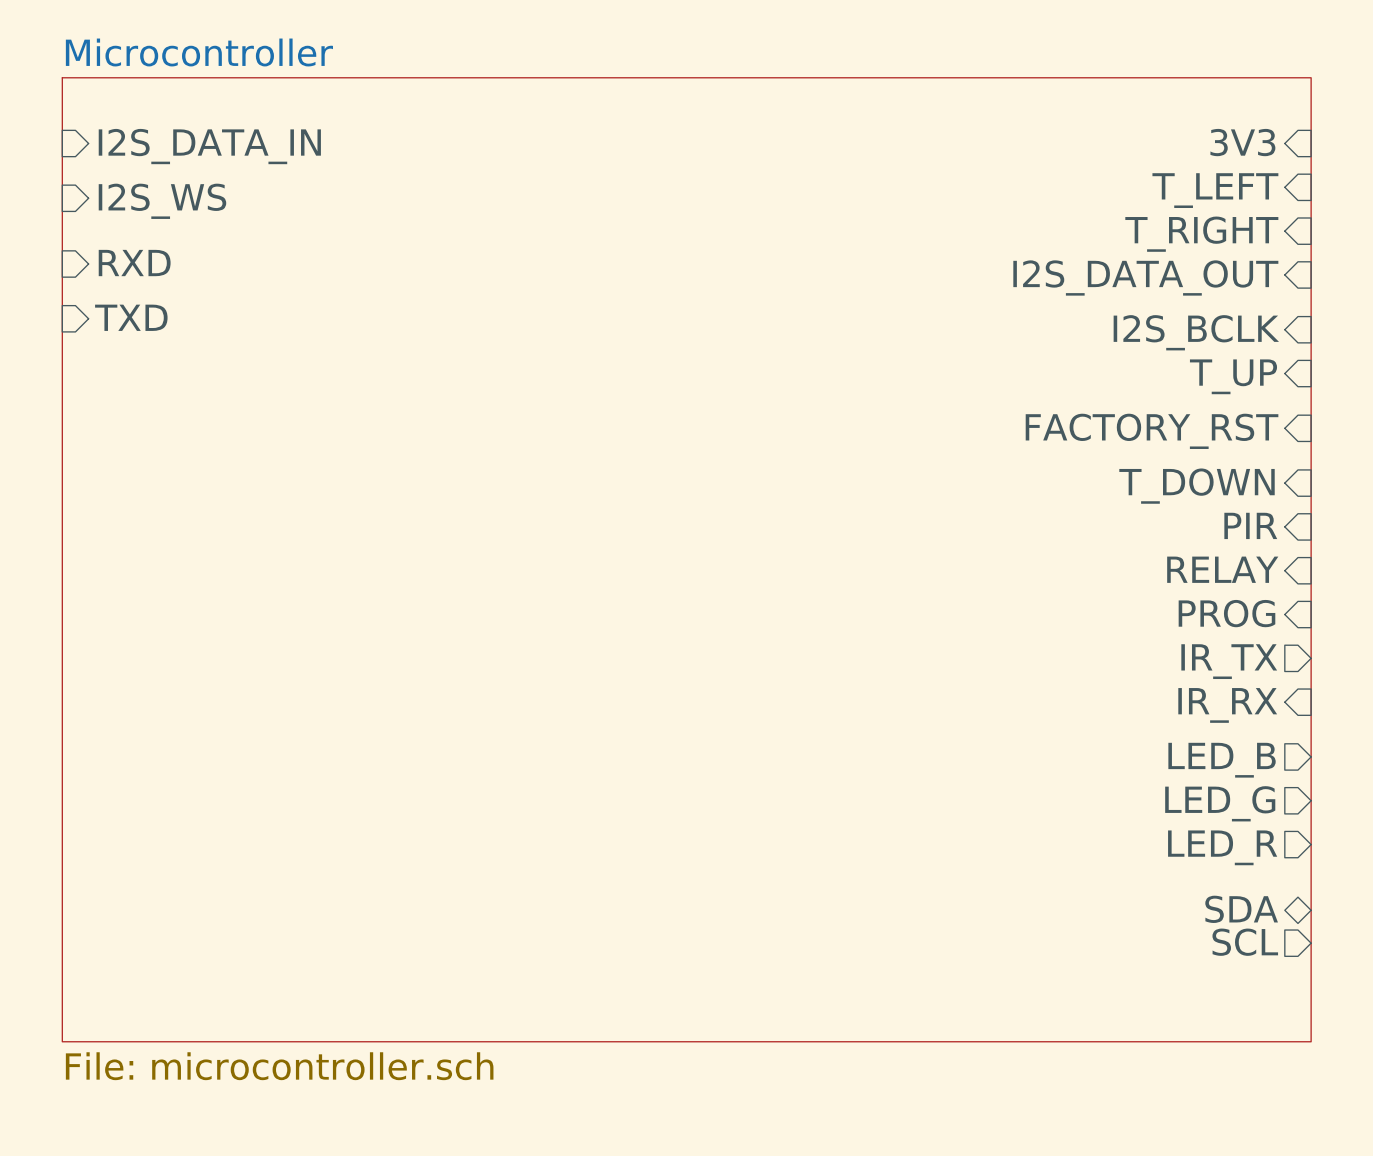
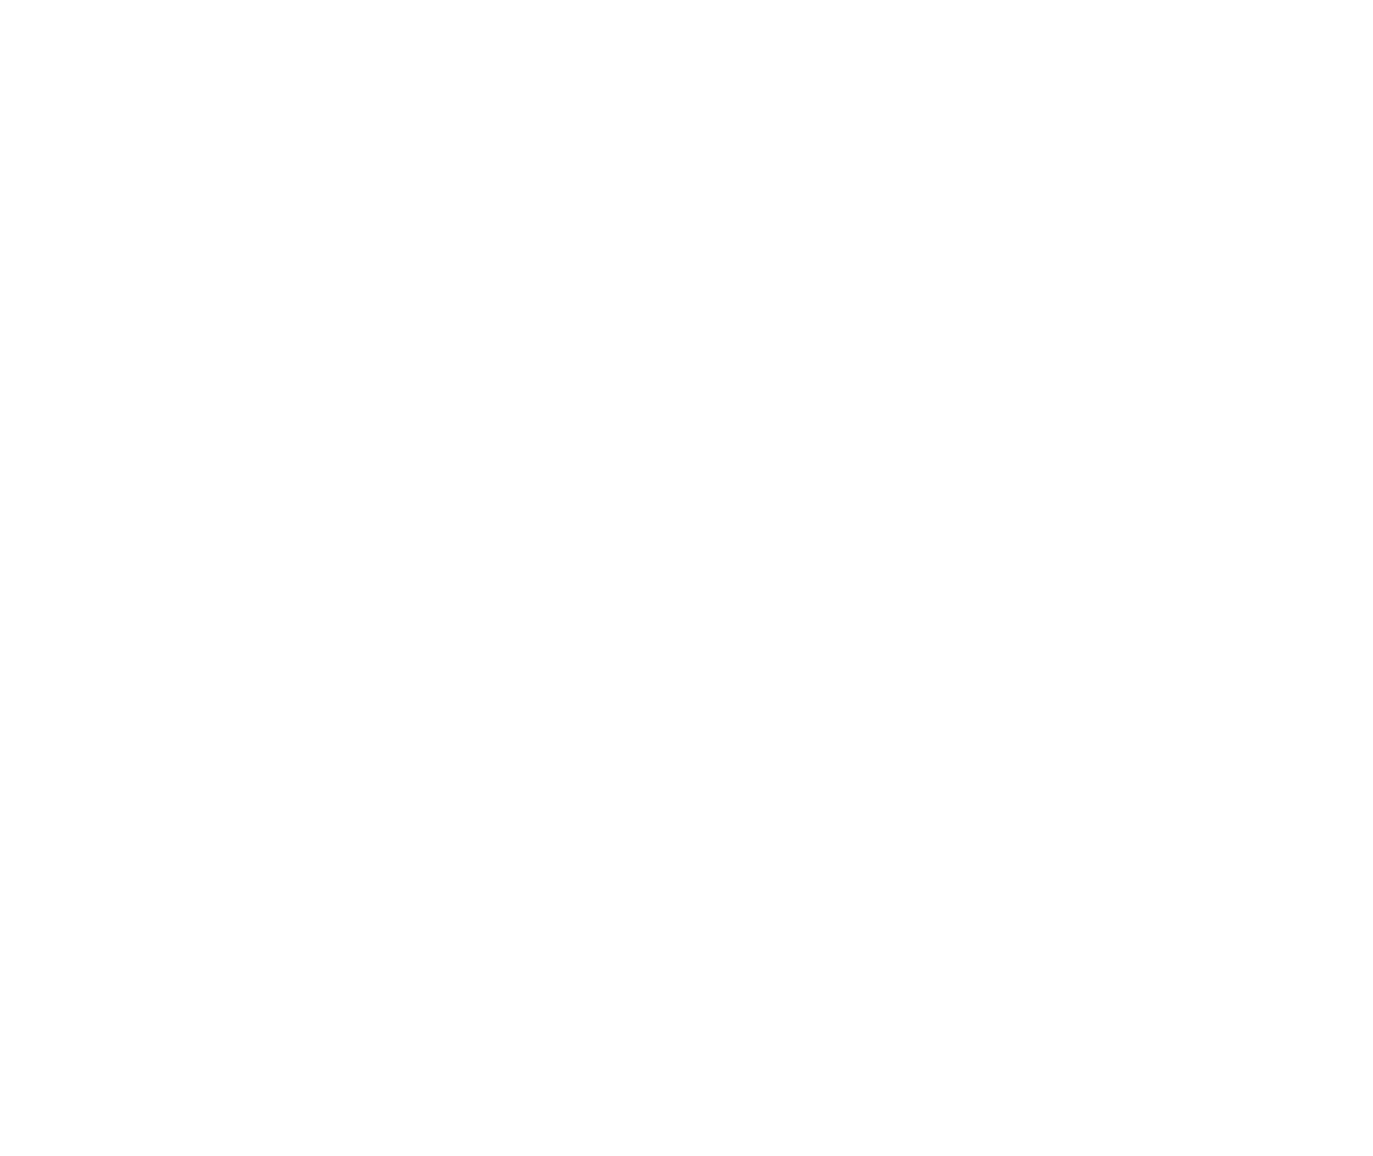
sheet pin: 3V3 (1242, 142) -> none
sheet pin: I2S_DATA_IN (209, 146) -> none
sheet pin: T_LEFT (1215, 190) -> none
sheet pin: I2S_WS (162, 201) -> none
sheet pin: T_RIGHT (1201, 234) -> none
sheet pin: RXD (134, 263) -> none
sheet pin: I2S_DATA_OUT (1145, 277) -> none
sheet pin: TXD (131, 317) -> none
sheet pin: I2S_BCLK (1196, 332) -> none
sheet pin: T_UP (1233, 376) -> none
sheet pin: FACTORY_RST (1152, 431) -> none
sheet pin: T_DOWN (1197, 486) -> none
sheet pin: PIR (1250, 525) -> none
sheet Microcontroller: File: microcontroller.sch (686, 559) -> none
sheet pin: RELAY (1222, 569) -> none
sheet pin: PROG (1226, 613) -> none
sheet pin: IR_TX (1229, 661) -> none
sheet pin: IR_RX (1227, 705) -> none
sheet pin: LED_B (1222, 760) -> none
sheet pin: LED_G (1220, 803) -> none
sheet pin: LED_R (1222, 847) -> none
sheet pin: SDA (1241, 909) -> none
sheet pin: SCL (1245, 942) -> none

